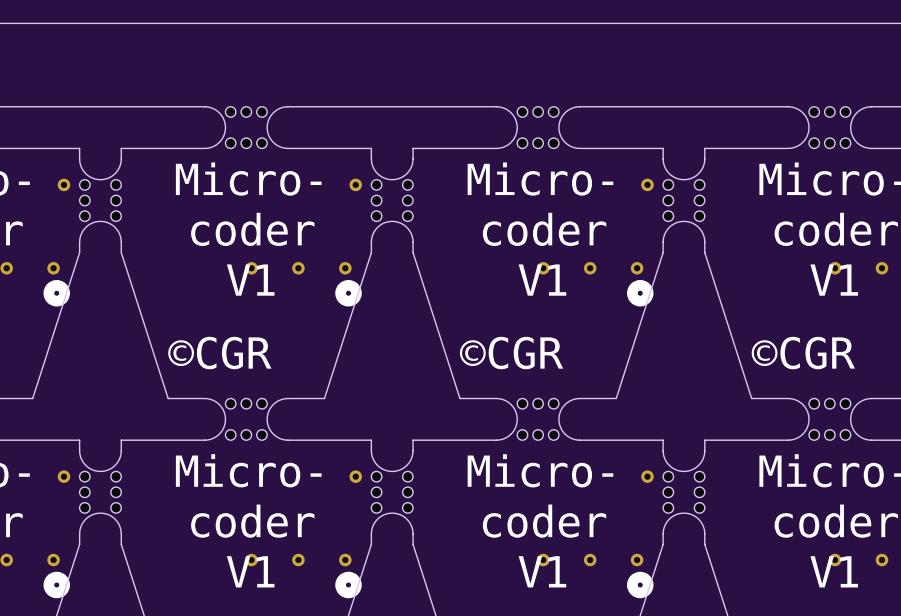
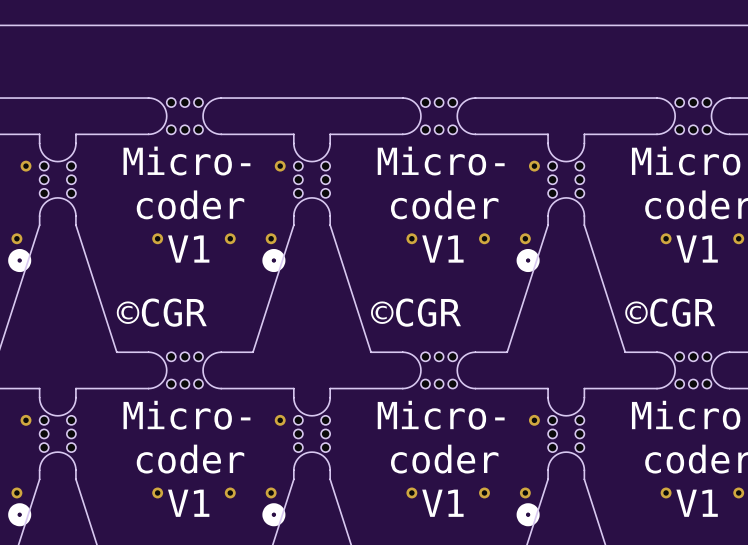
via position: (251, 268) -> (157, 238)
via position: (543, 268) -> (411, 238)
via position: (835, 268) -> (666, 238)
via position: (251, 560) -> (157, 492)
via position: (543, 560) -> (411, 492)
via position: (835, 560) -> (666, 492)

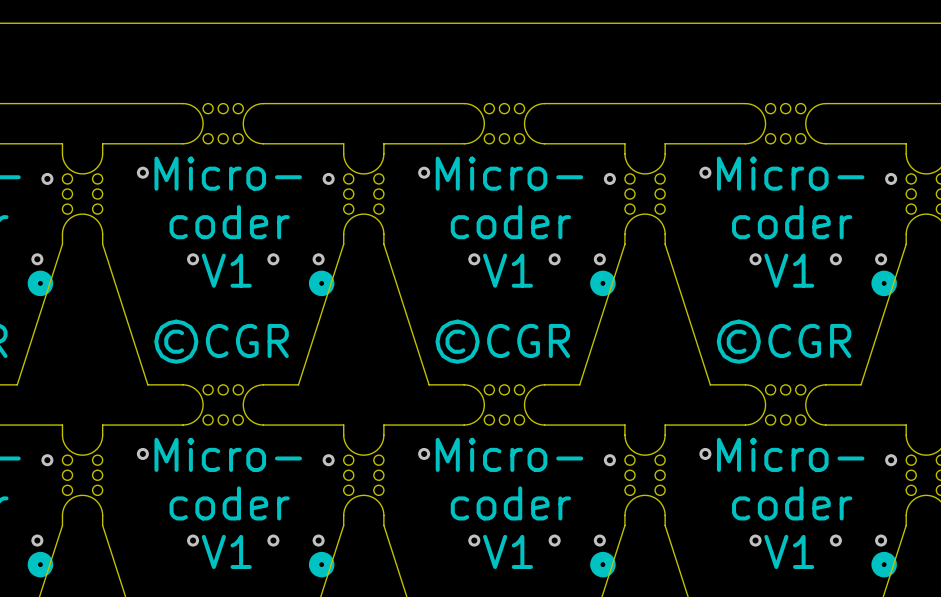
via: none -> (142, 172)
via: none -> (424, 172)
via: none -> (705, 172)
via: none -> (142, 453)
via: none -> (424, 453)
via: none -> (705, 453)

